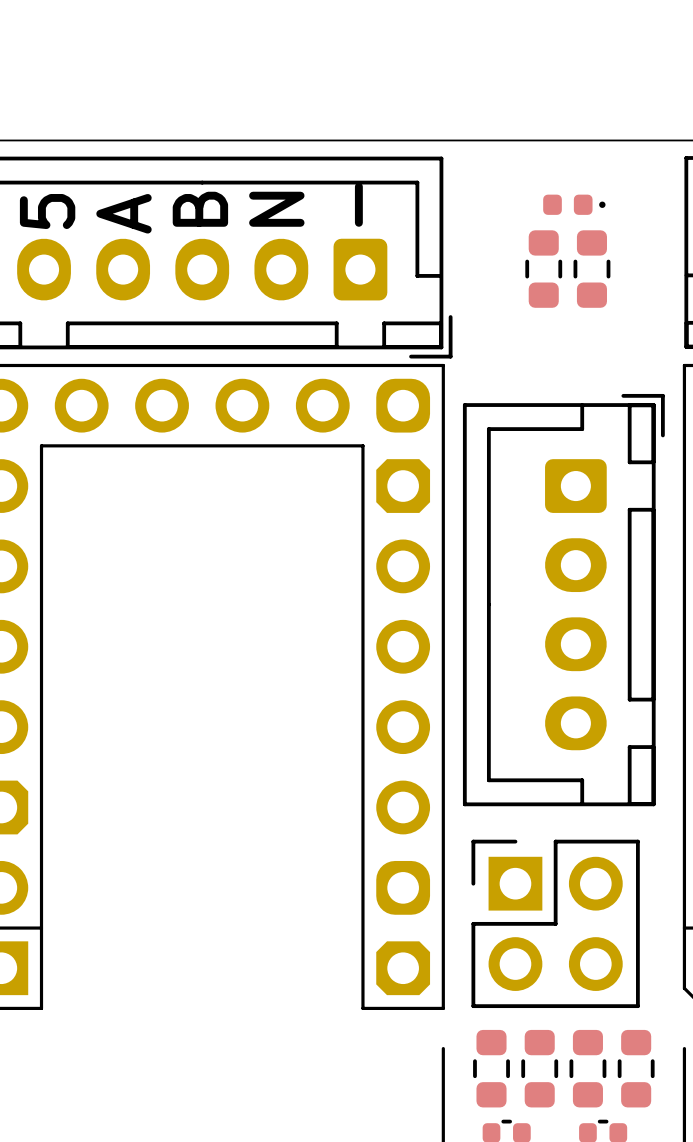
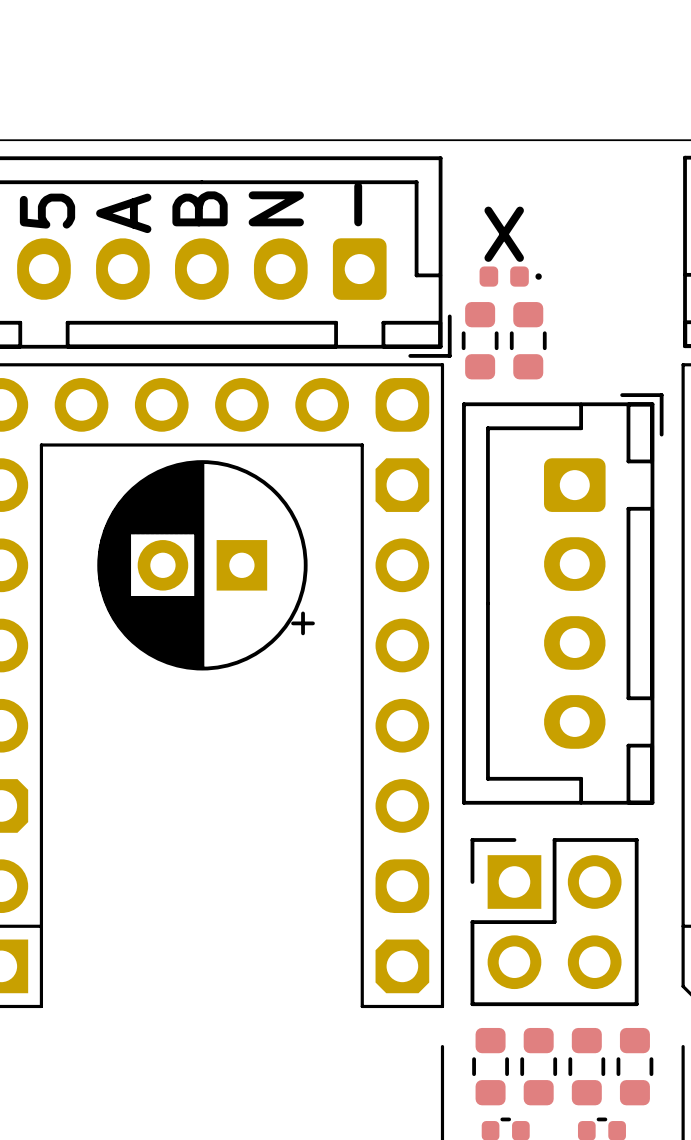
part position: (574, 204) -> (510, 276)
text: none -> X (504, 234)
part: (543, 269) -> none
part: (591, 269) -> none
part: none -> (480, 340)
part: none -> (528, 340)
part: none -> (206, 565)

